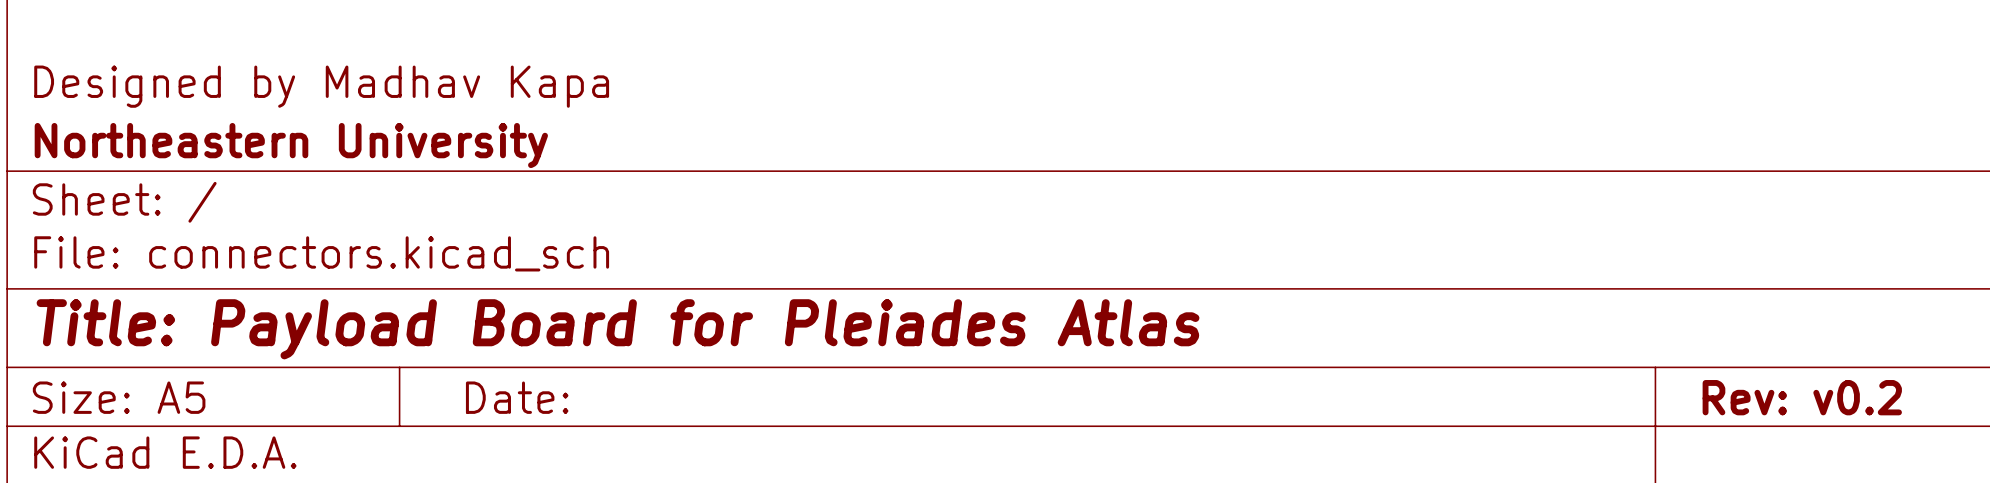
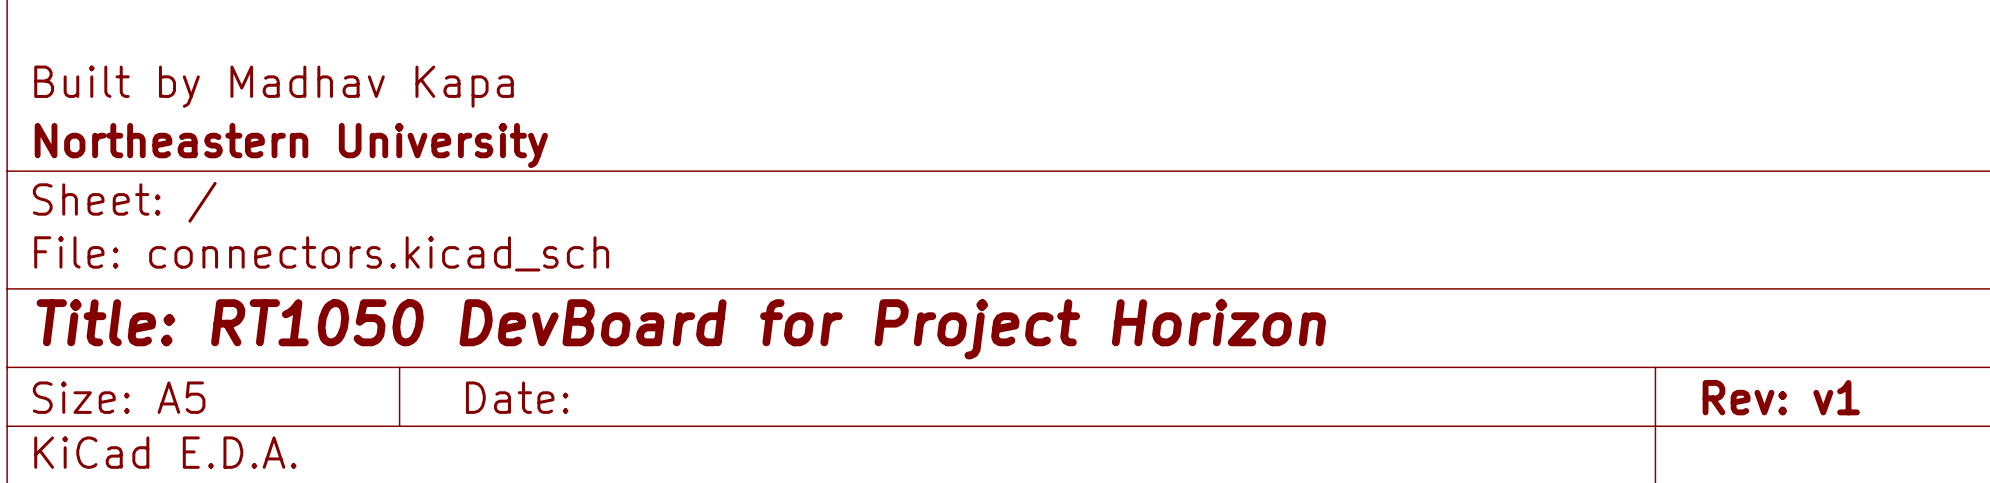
title block: Designed by Madhav Kapa (321, 86) -> Built by Madhav Kapa (274, 86)
title block: Title: Payload Board for Pleiades Atlas (618, 329) -> Title: RT1050 DevBoard for Project Horizon (681, 329)
title block: Rev: v0.2 (1802, 397) -> Rev: v1 (1781, 397)

